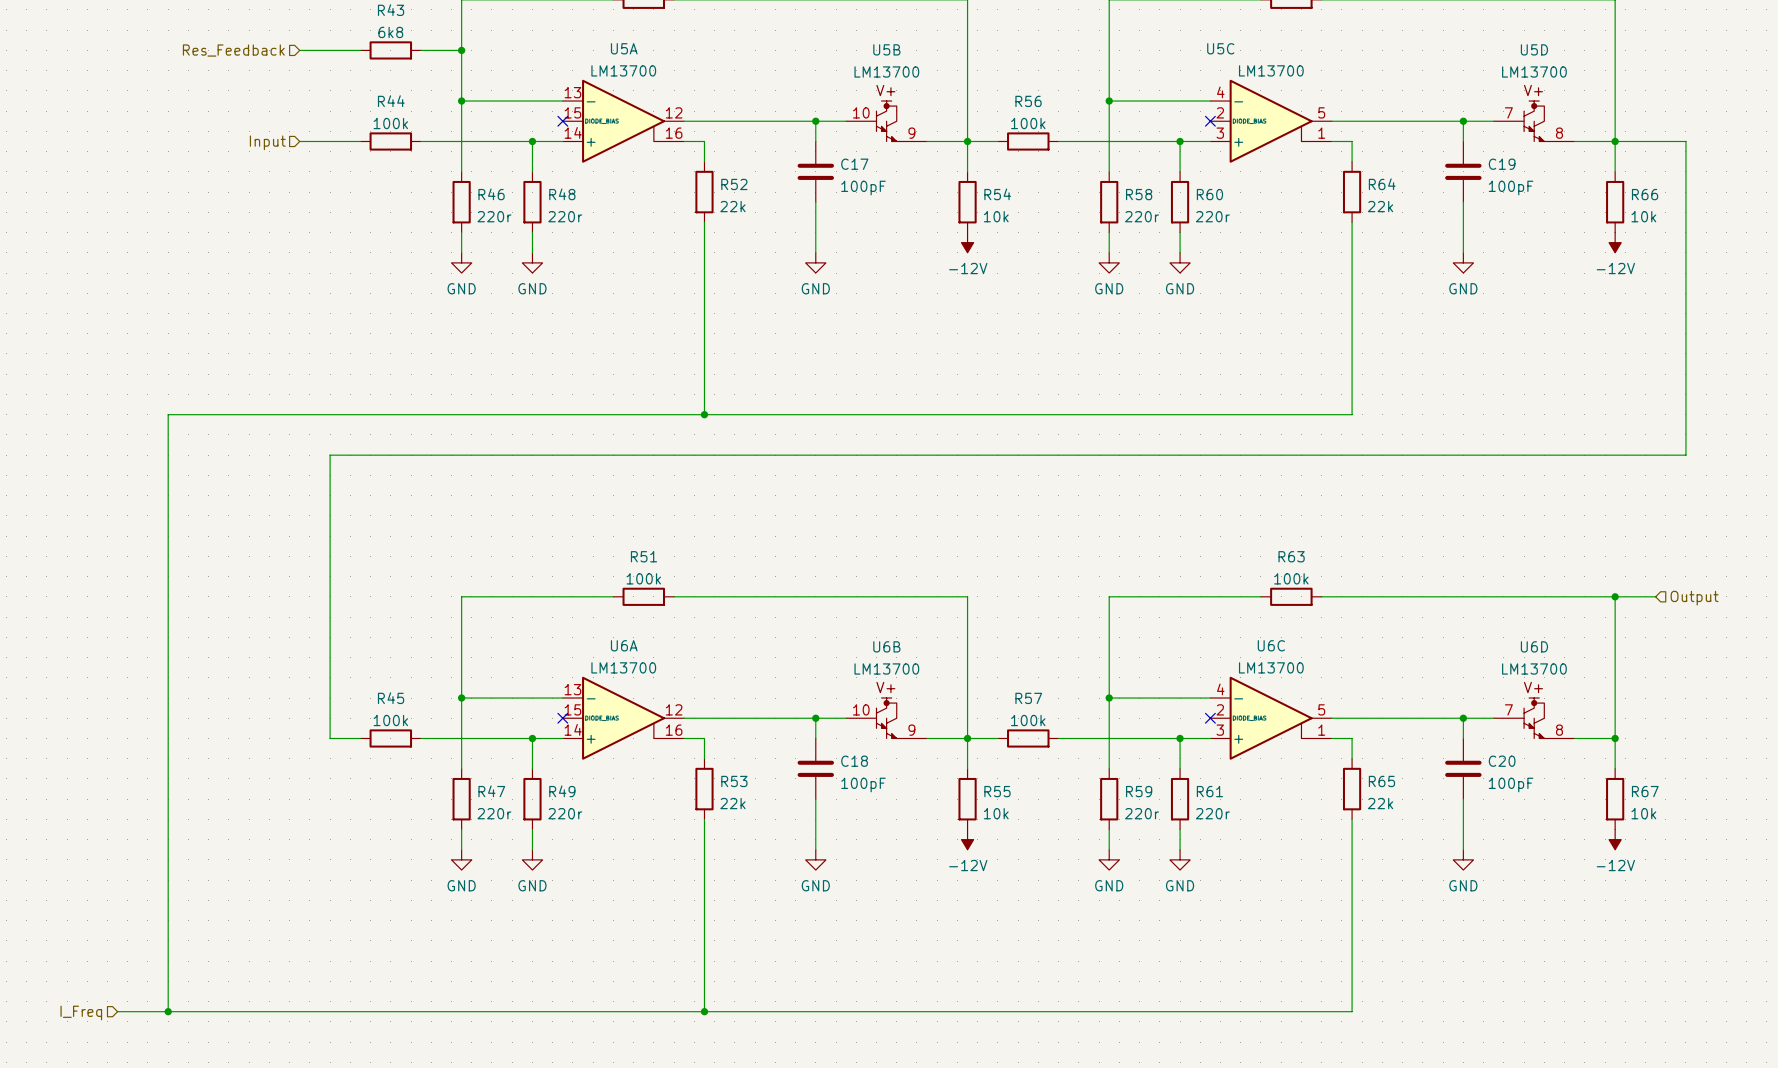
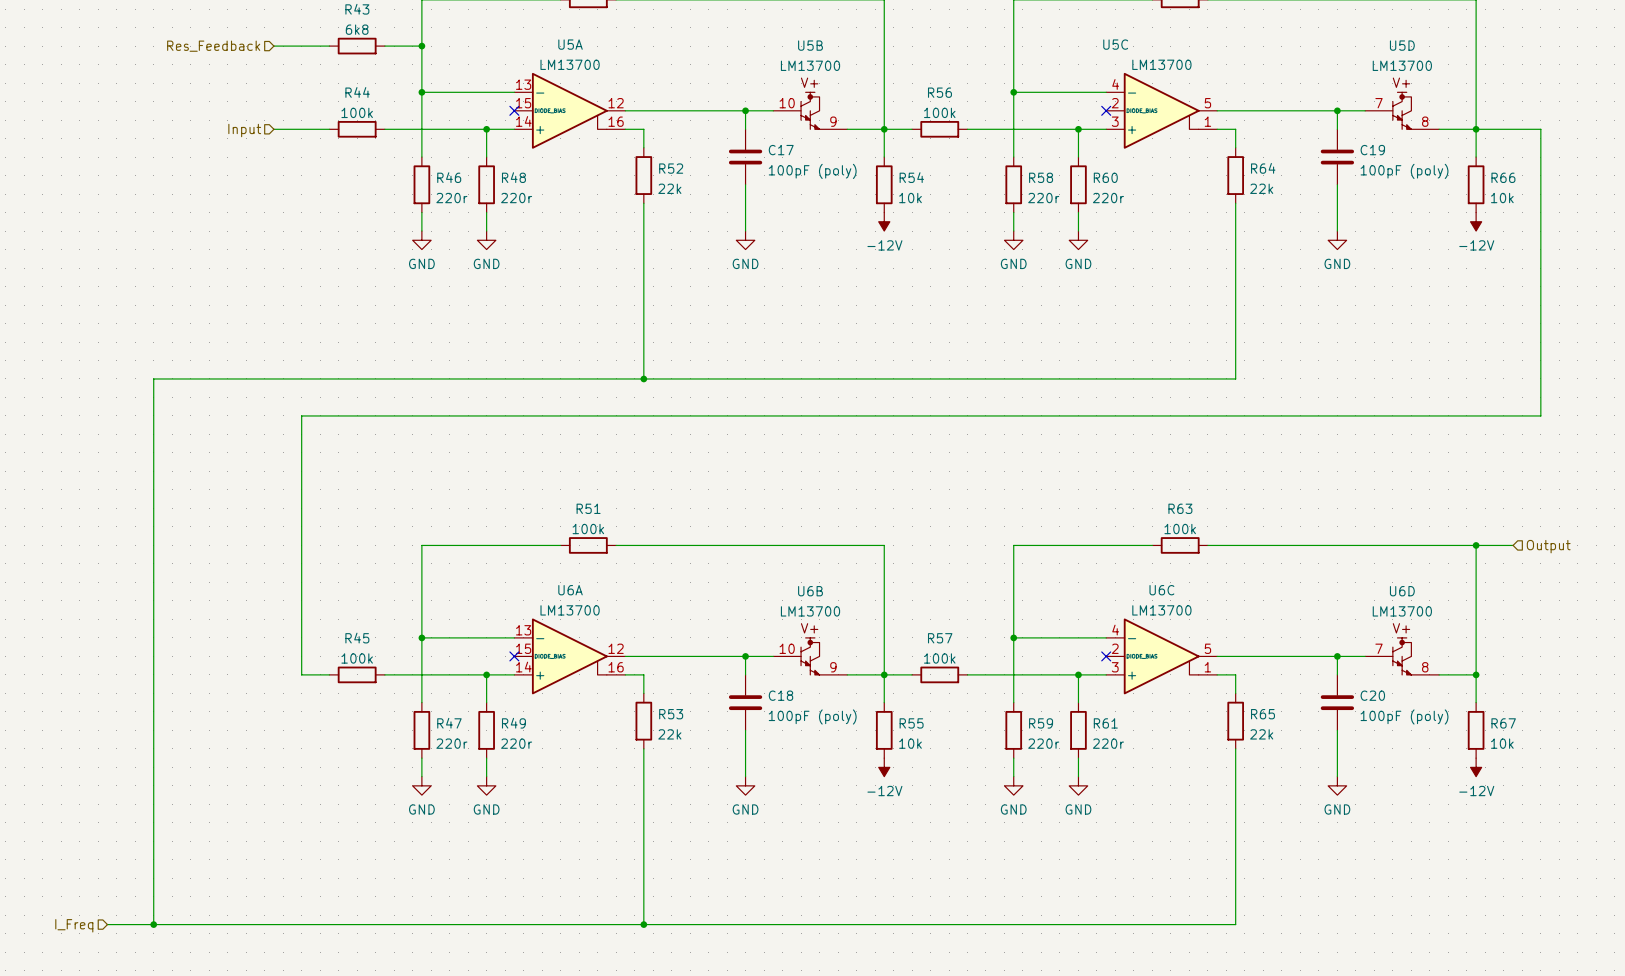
C17 value: 100pF (863, 188) -> 100pF (poly) (812, 171)
C19 value: 100pF (1511, 188) -> 100pF (poly) (1404, 171)
C18 value: 100pF (863, 785) -> 100pF (poly) (812, 716)
C20 value: 100pF (1511, 785) -> 100pF (poly) (1404, 716)

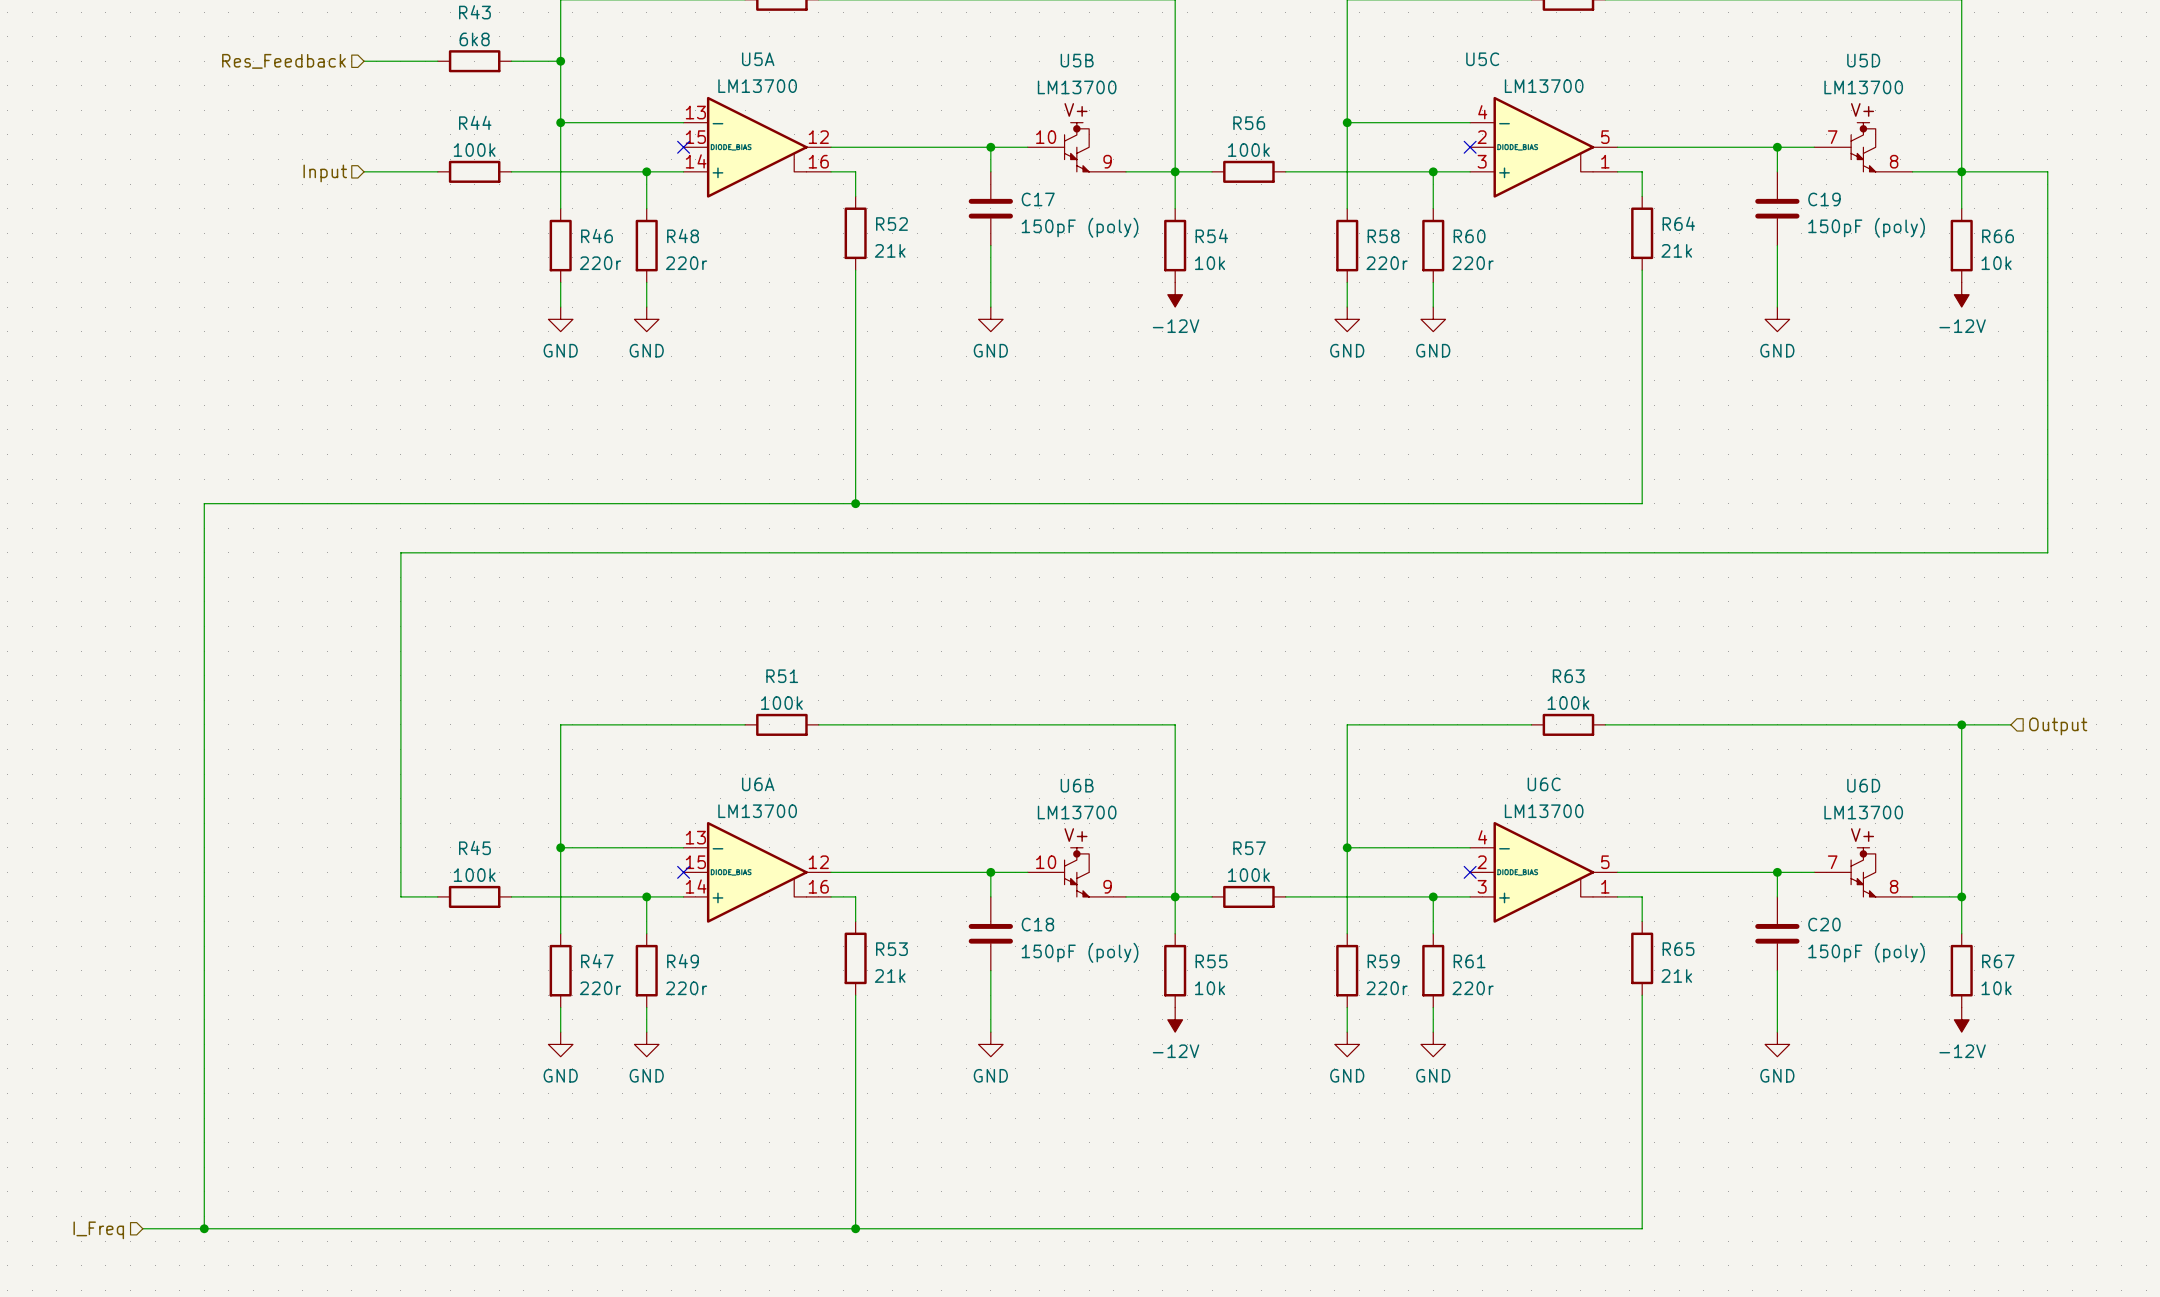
C17 value: 100pF (poly) (812, 171) -> 150pF (poly) (1080, 227)
C19 value: 100pF (poly) (1404, 171) -> 150pF (poly) (1866, 227)
R52 value: 22k (669, 188) -> 21k (890, 250)
R64 value: 22k (1261, 188) -> 21k (1676, 250)
C18 value: 100pF (poly) (812, 716) -> 150pF (poly) (1080, 952)
C20 value: 100pF (poly) (1404, 716) -> 150pF (poly) (1866, 952)
R53 value: 22k (669, 734) -> 21k (890, 975)
R65 value: 22k (1261, 734) -> 21k (1676, 975)

